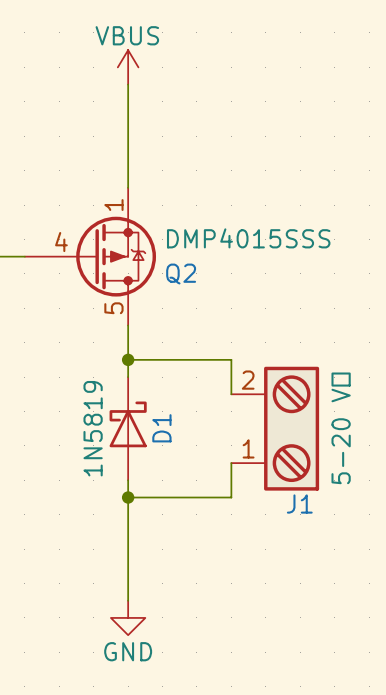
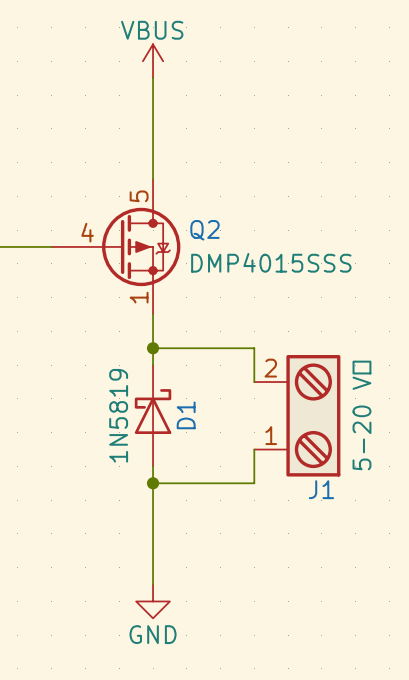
Q2 flip: as is (116, 256) -> up-down (141, 246)

